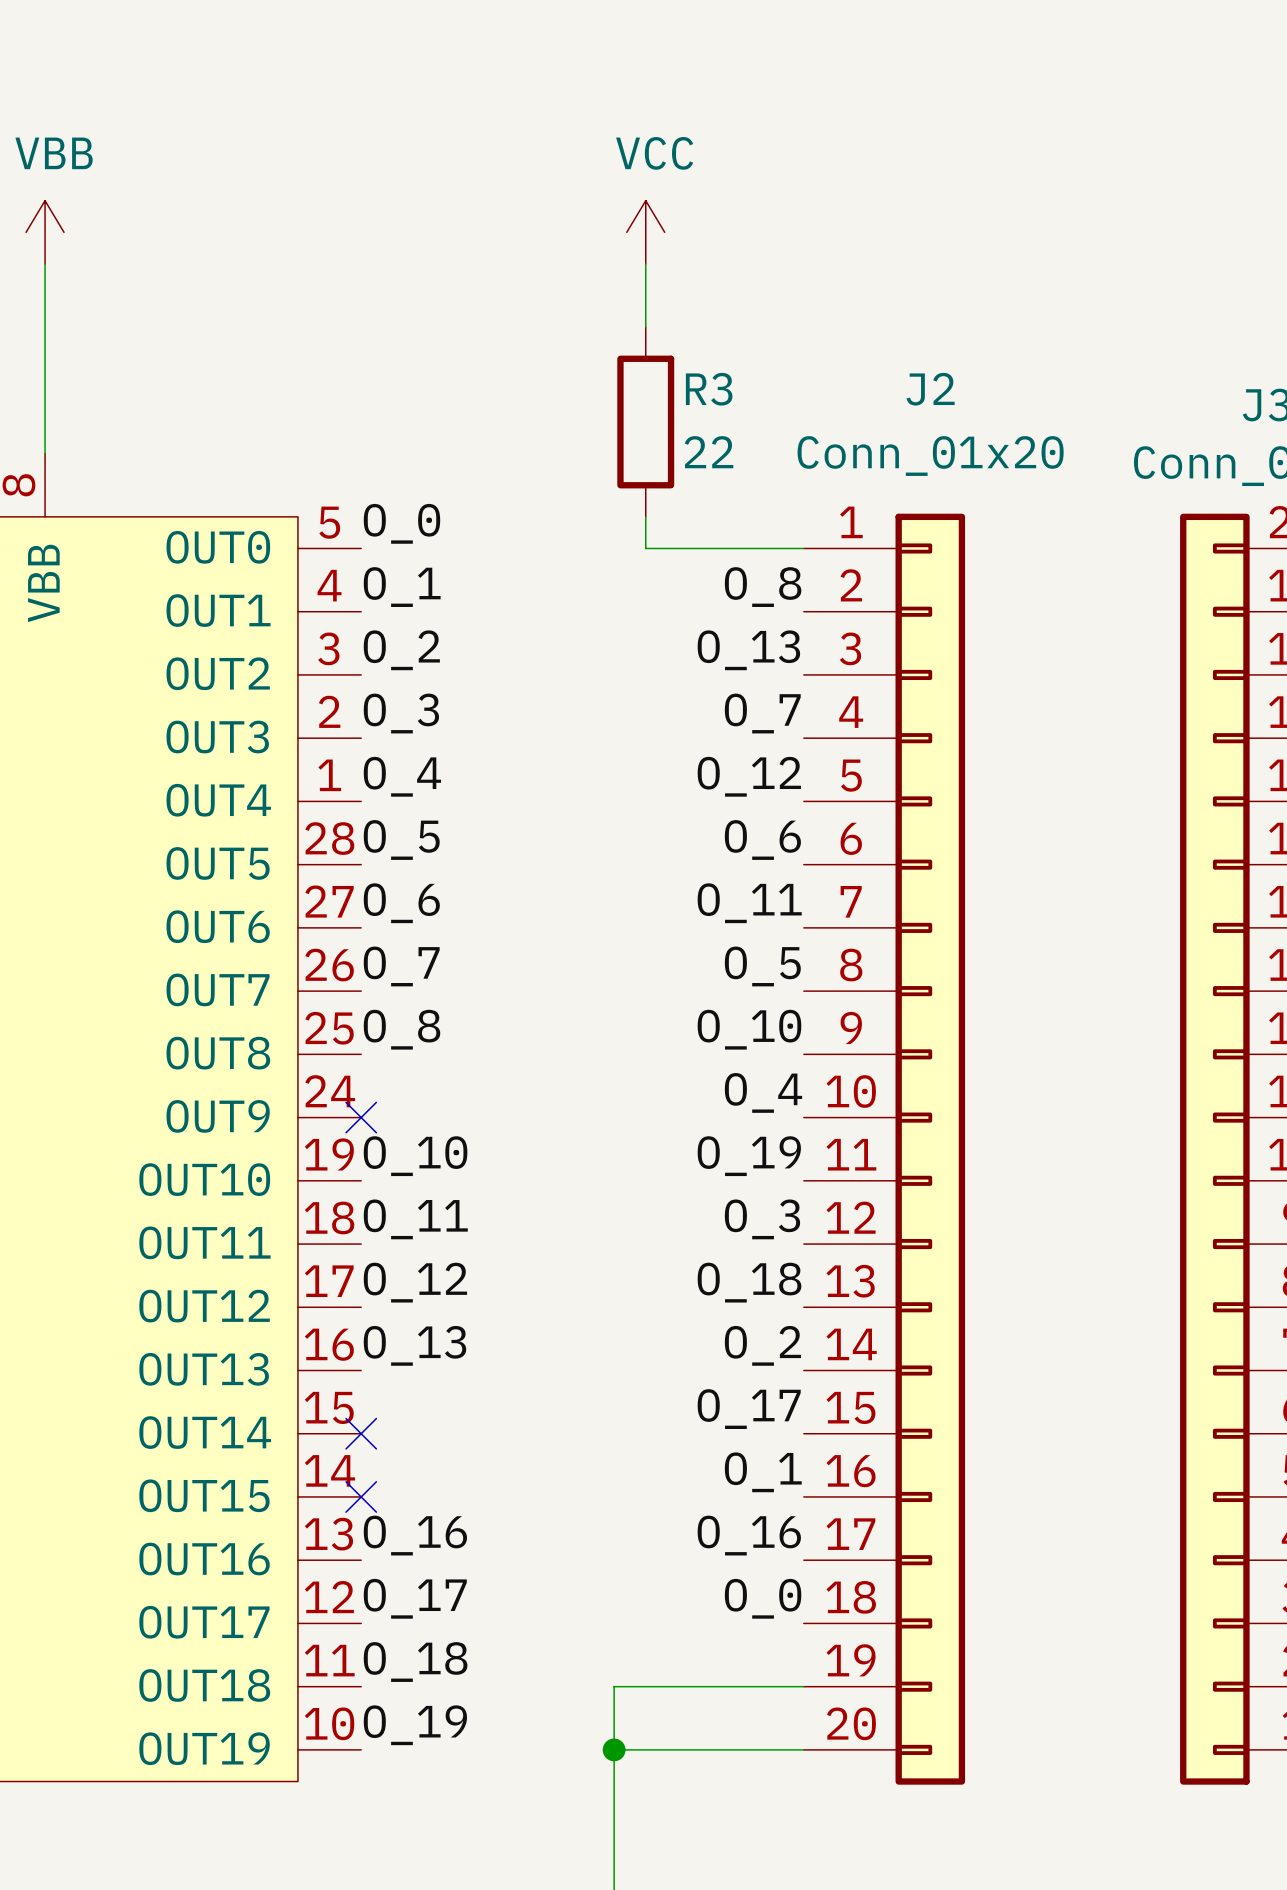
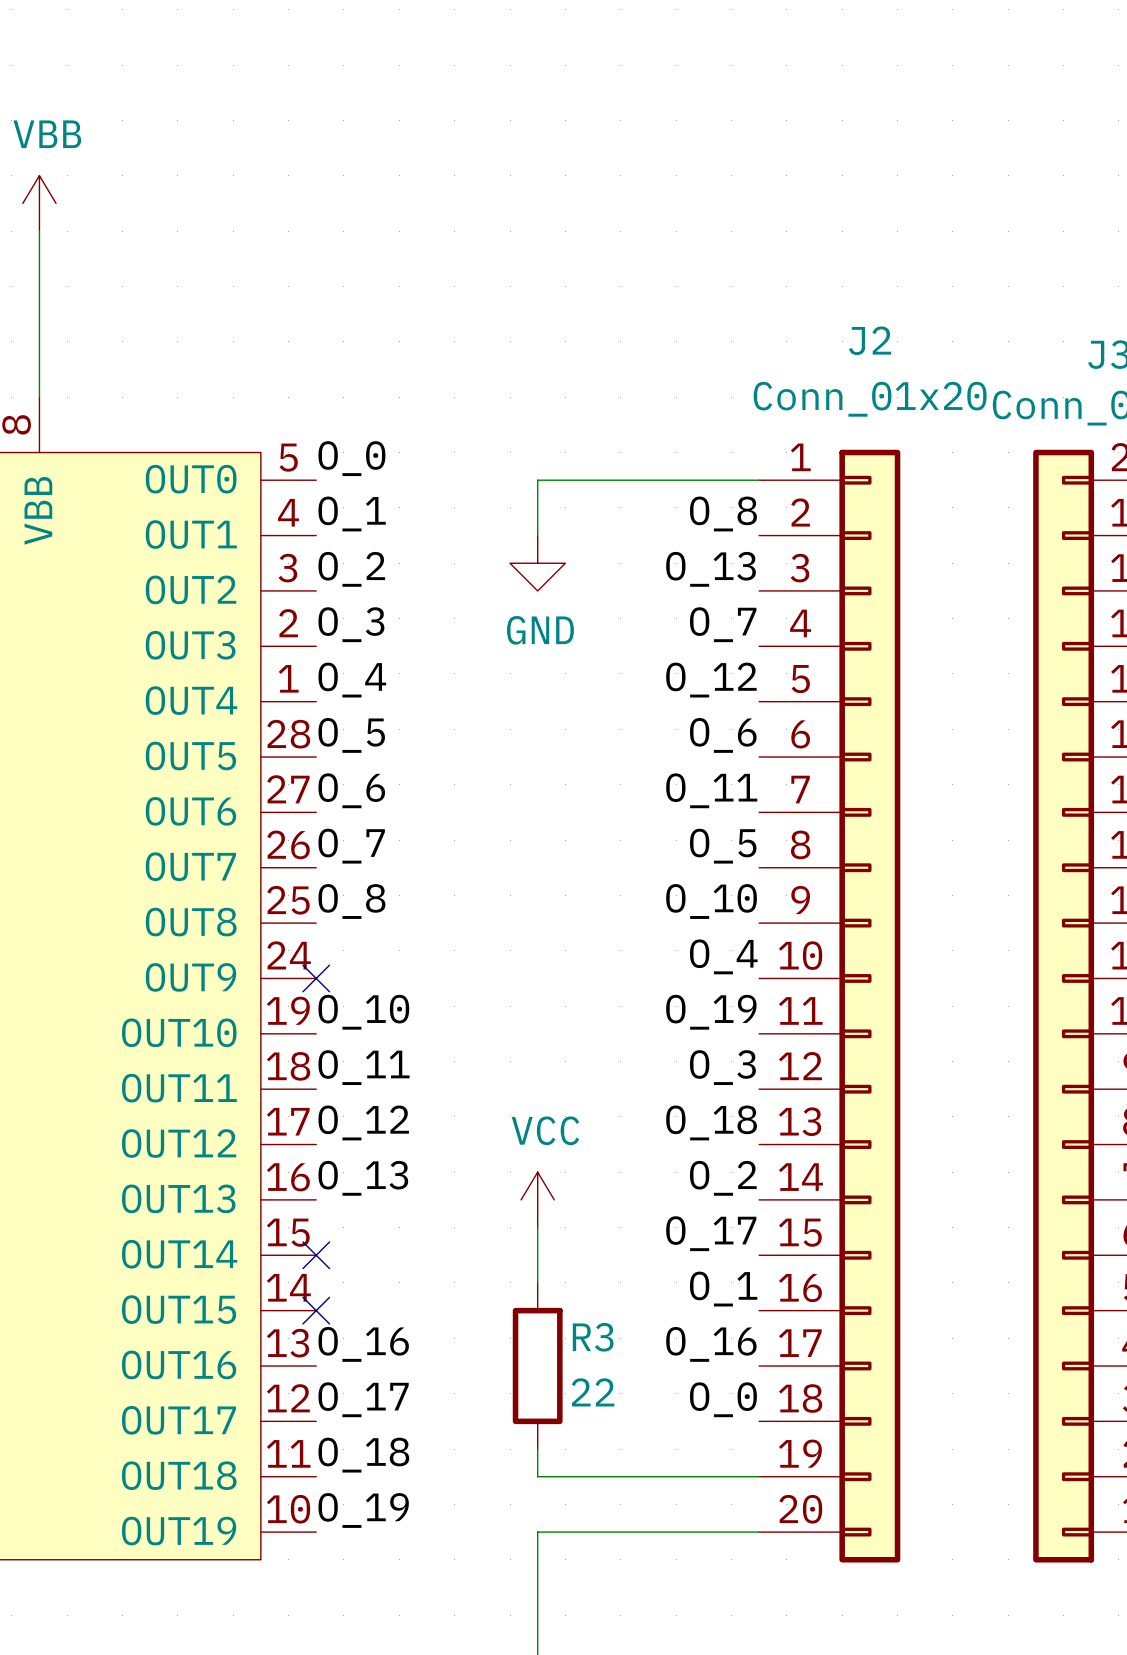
power symbol: VCC (645, 232) -> none
wire: (645, 263) (645, 327) -> none
R3 position: (645, 422) -> (537, 1365)
wire: (645, 516) (645, 548) -> (537, 535) (537, 480) (565, 480)
label position: O_8 (763, 587) -> O_8 (723, 513)
power symbol: none -> GND (537, 563)
label position: O_13 (748, 650) -> O_13 (711, 569)
label position: O_7 (762, 713) -> O_7 (723, 624)
label position: O_12 (749, 776) -> O_12 (711, 680)
label position: O_6 (762, 839) -> O_6 (723, 735)
label position: O_11 (749, 903) -> O_11 (711, 790)
label position: O_5 (762, 966) -> O_5 (723, 846)
label position: O_10 (749, 1029) -> O_10 (711, 901)
label position: O_4 (763, 1092) -> O_4 (723, 956)
J2 position: (884, 1149) -> (829, 1006)
label position: O_19 (749, 1156) -> O_19 (711, 1012)
label position: O_3 (762, 1219) -> O_3 (722, 1067)
label position: O_18 (749, 1282) -> O_18 (711, 1122)
label position: O_2 (762, 1345) -> O_2 (723, 1178)
power symbol: none -> VCC (537, 1199)
wire: none -> (537, 1227) (537, 1282)
label position: O_17 (749, 1409) -> O_17 (711, 1233)
label position: O_1 (763, 1472) -> O_1 (723, 1289)
label position: O_16 (749, 1535) -> O_16 (711, 1344)
label position: O_0 (763, 1598) -> O_0 (723, 1399)
wire: (614, 1686) (614, 1749) -> (537, 1476) (537, 1449)
junction: (614, 1749) -> none

